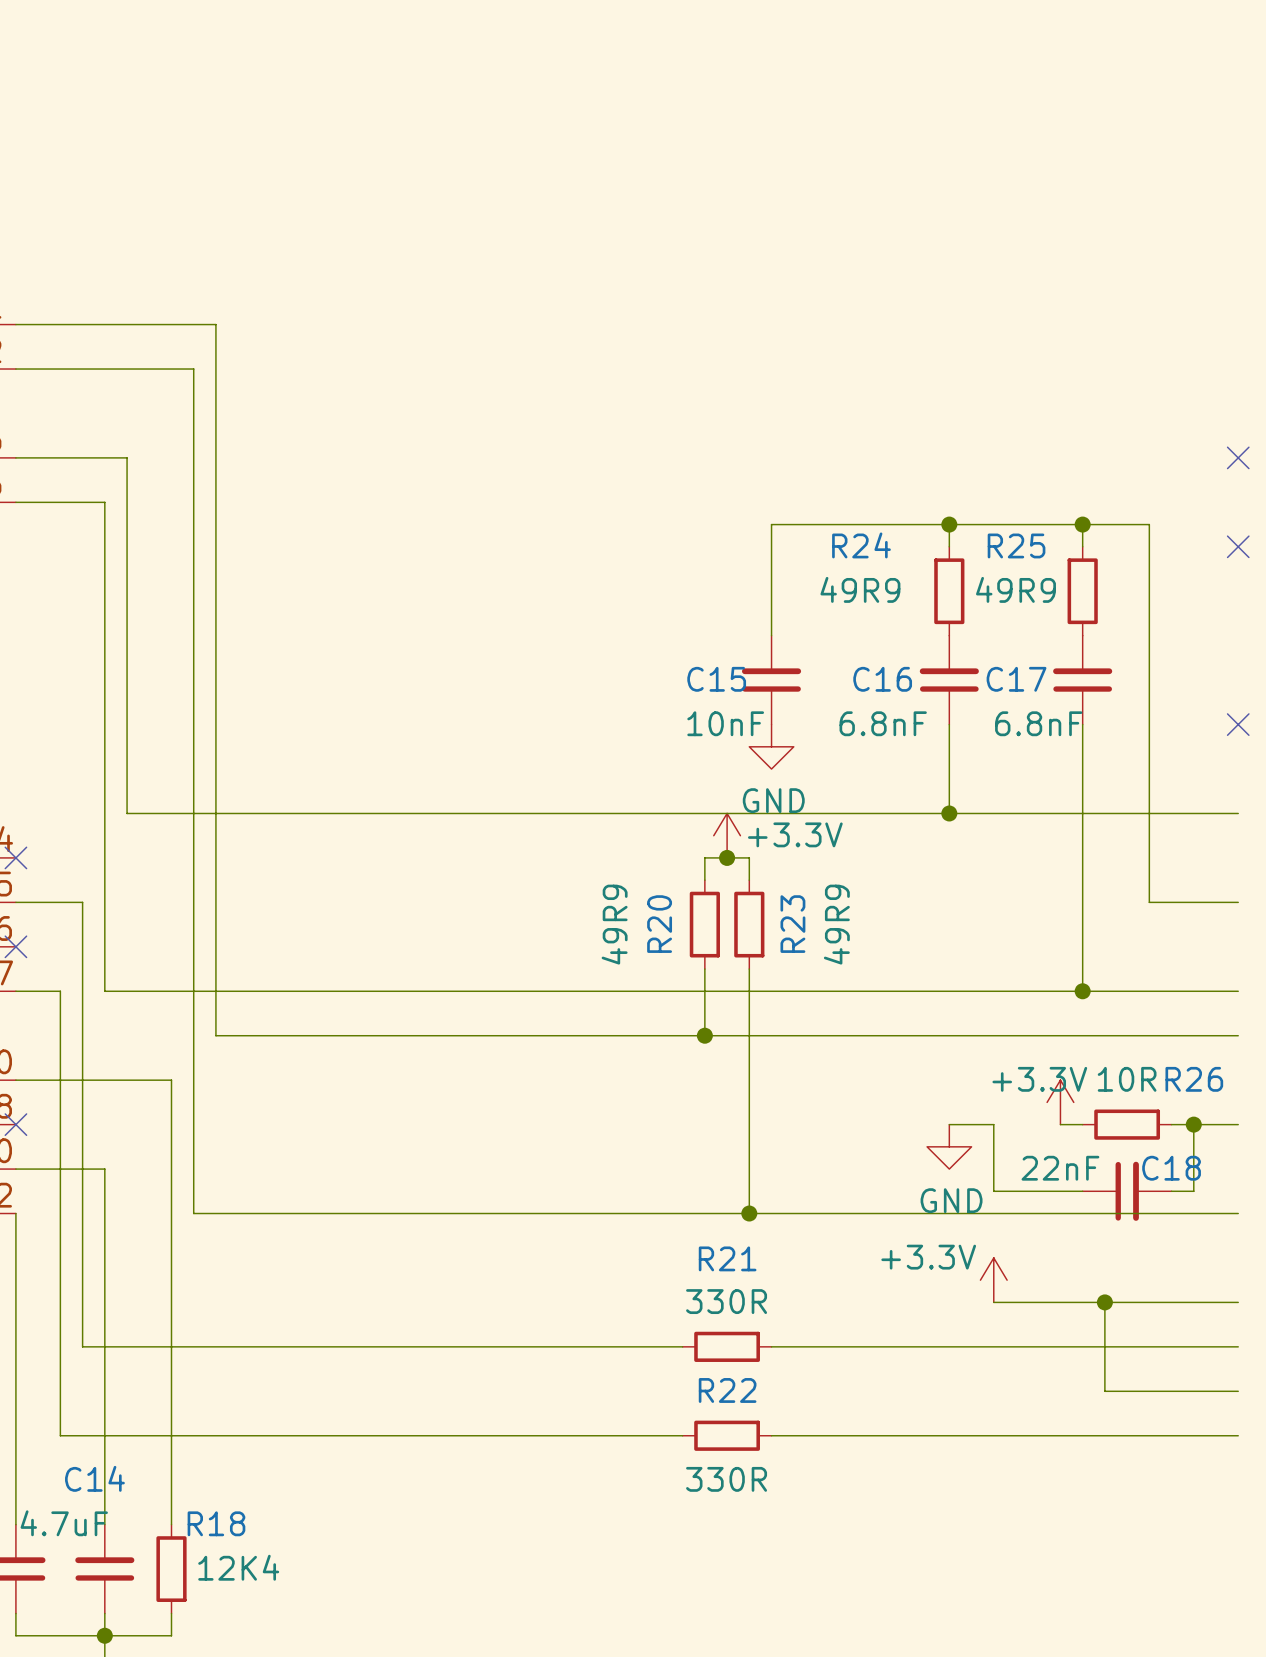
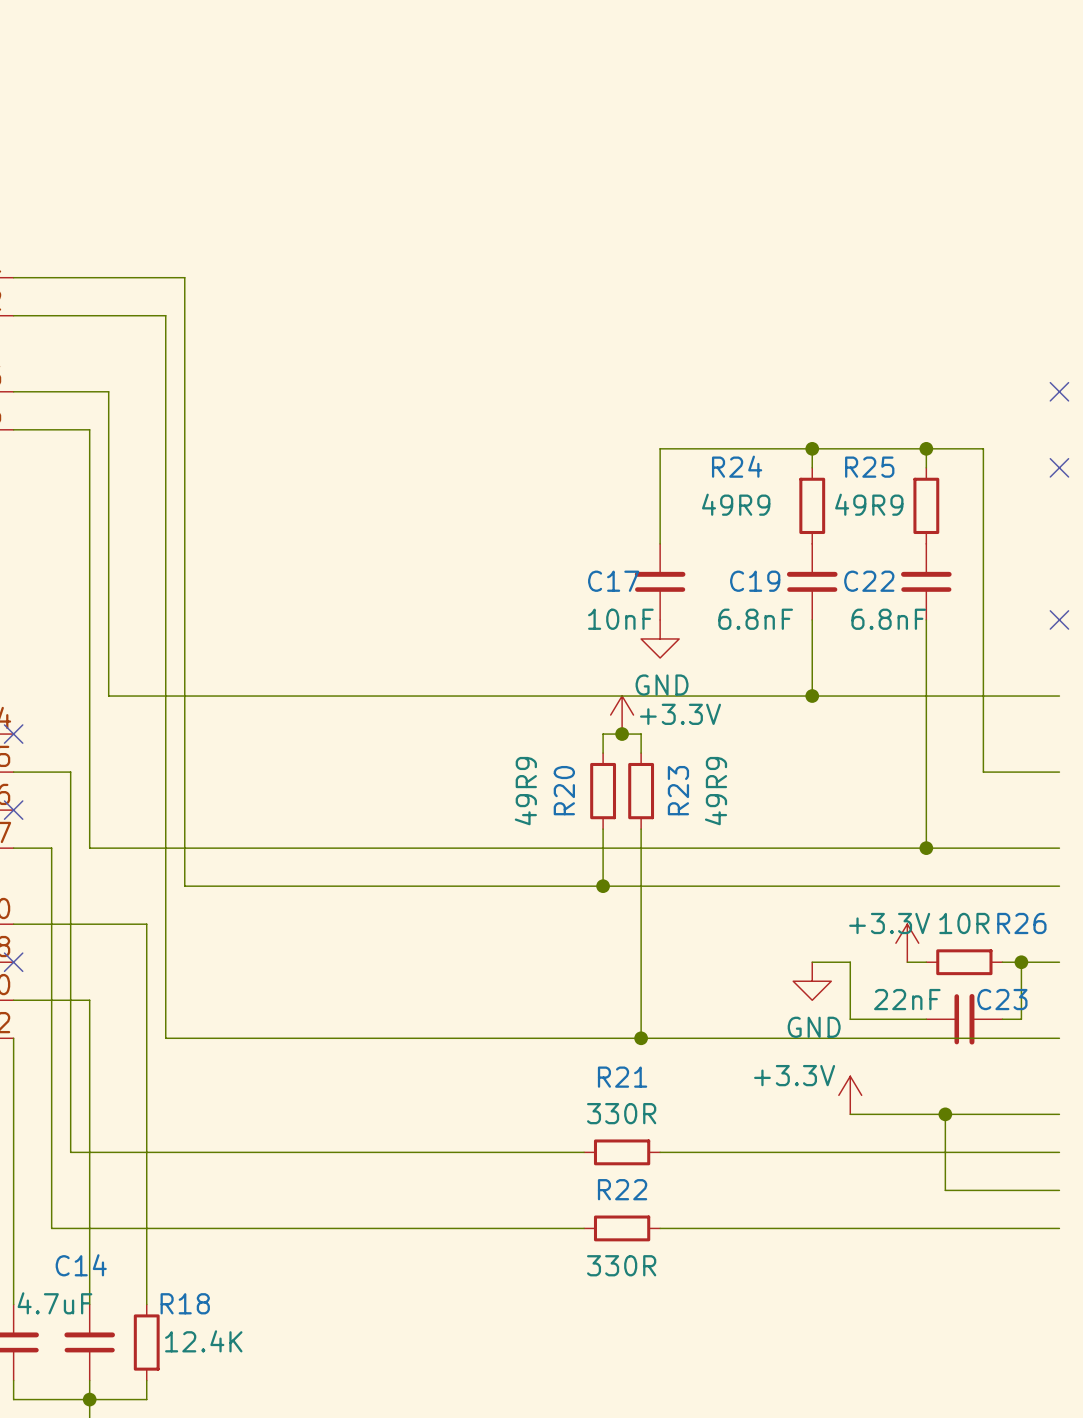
C15 name: C15 (716, 679) -> C17 (613, 581)
C16 name: C16 (882, 679) -> C19 (755, 581)
C17 name: C17 (1016, 679) -> C22 (869, 581)
C18 name: C18 (1171, 1168) -> C23 (1002, 999)
R18 value: 12K4 (238, 1567) -> 12.4K (203, 1341)

